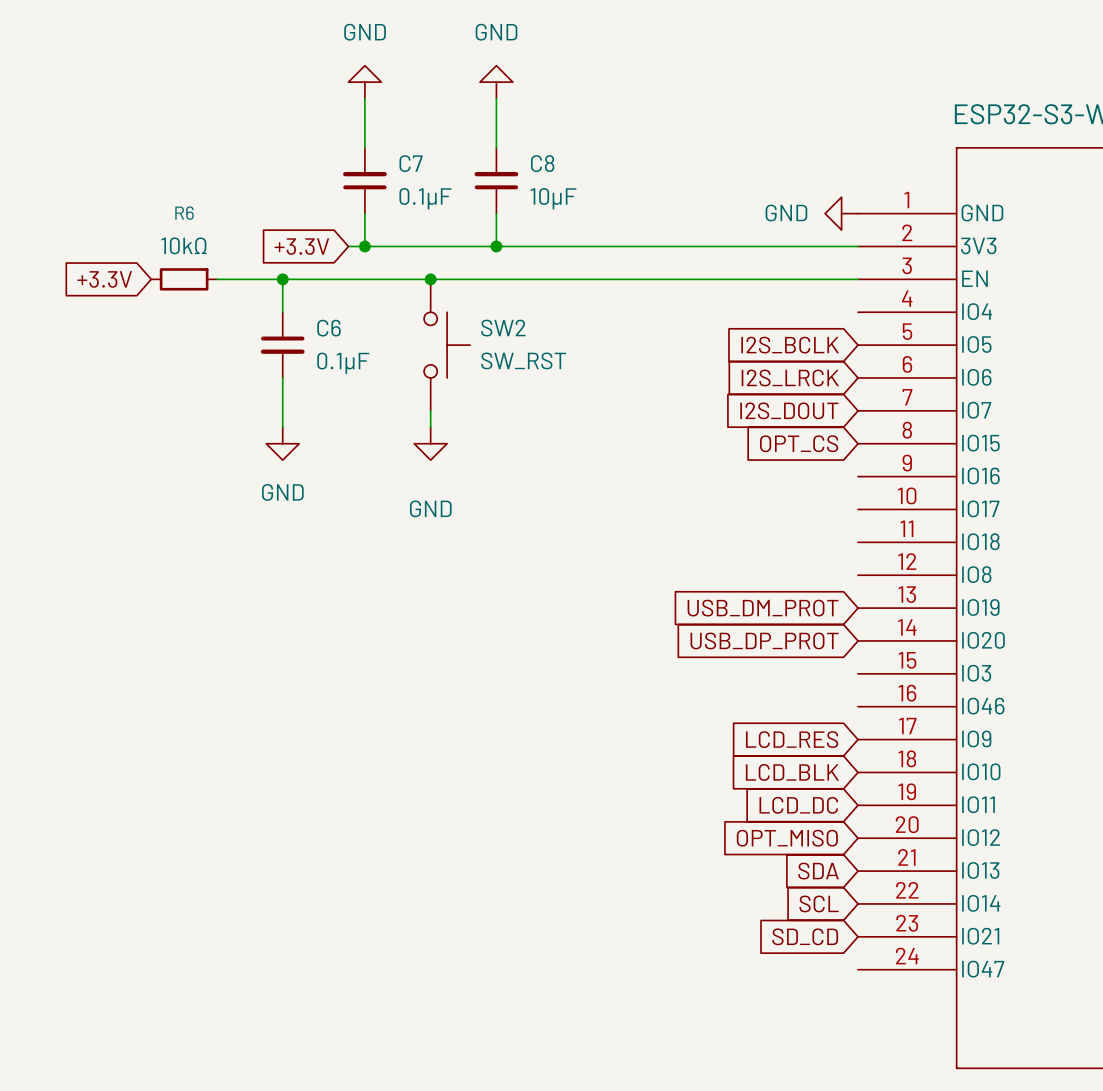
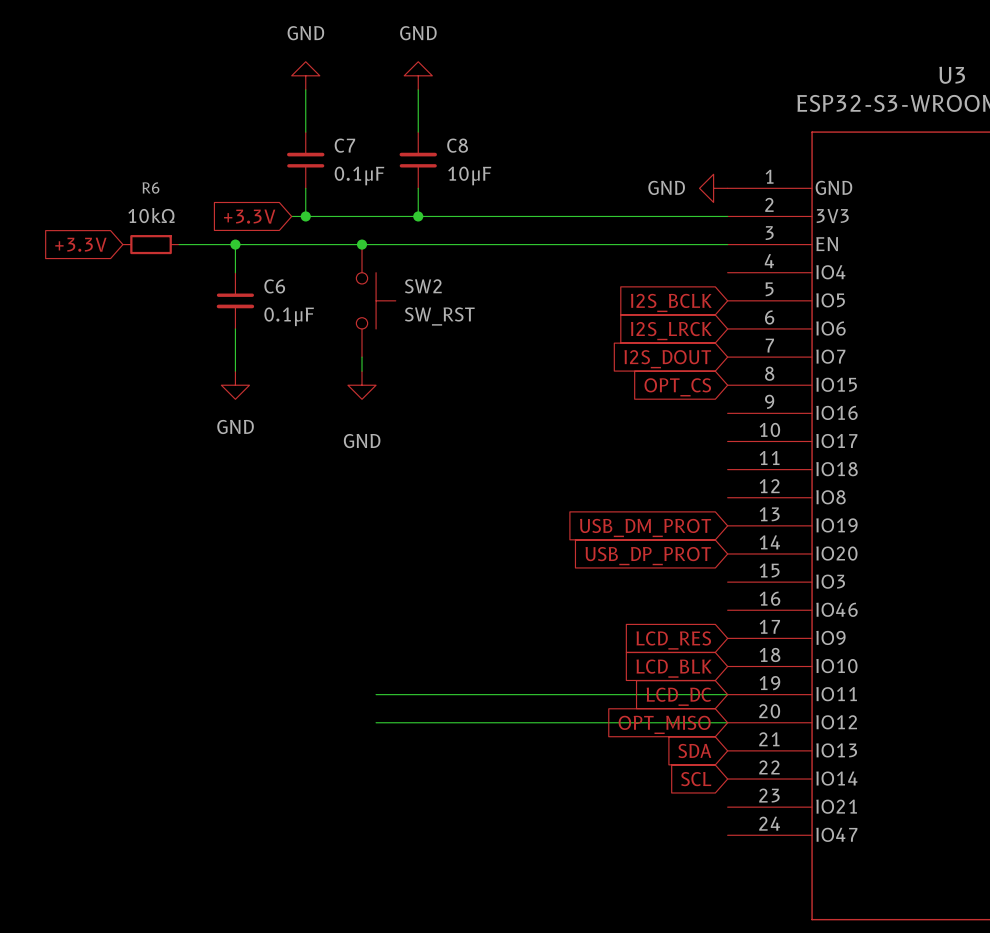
wire: none -> (376, 694) (727, 694)
wire: none -> (376, 722) (727, 722)
global label: SD_CD (805, 936) -> none

